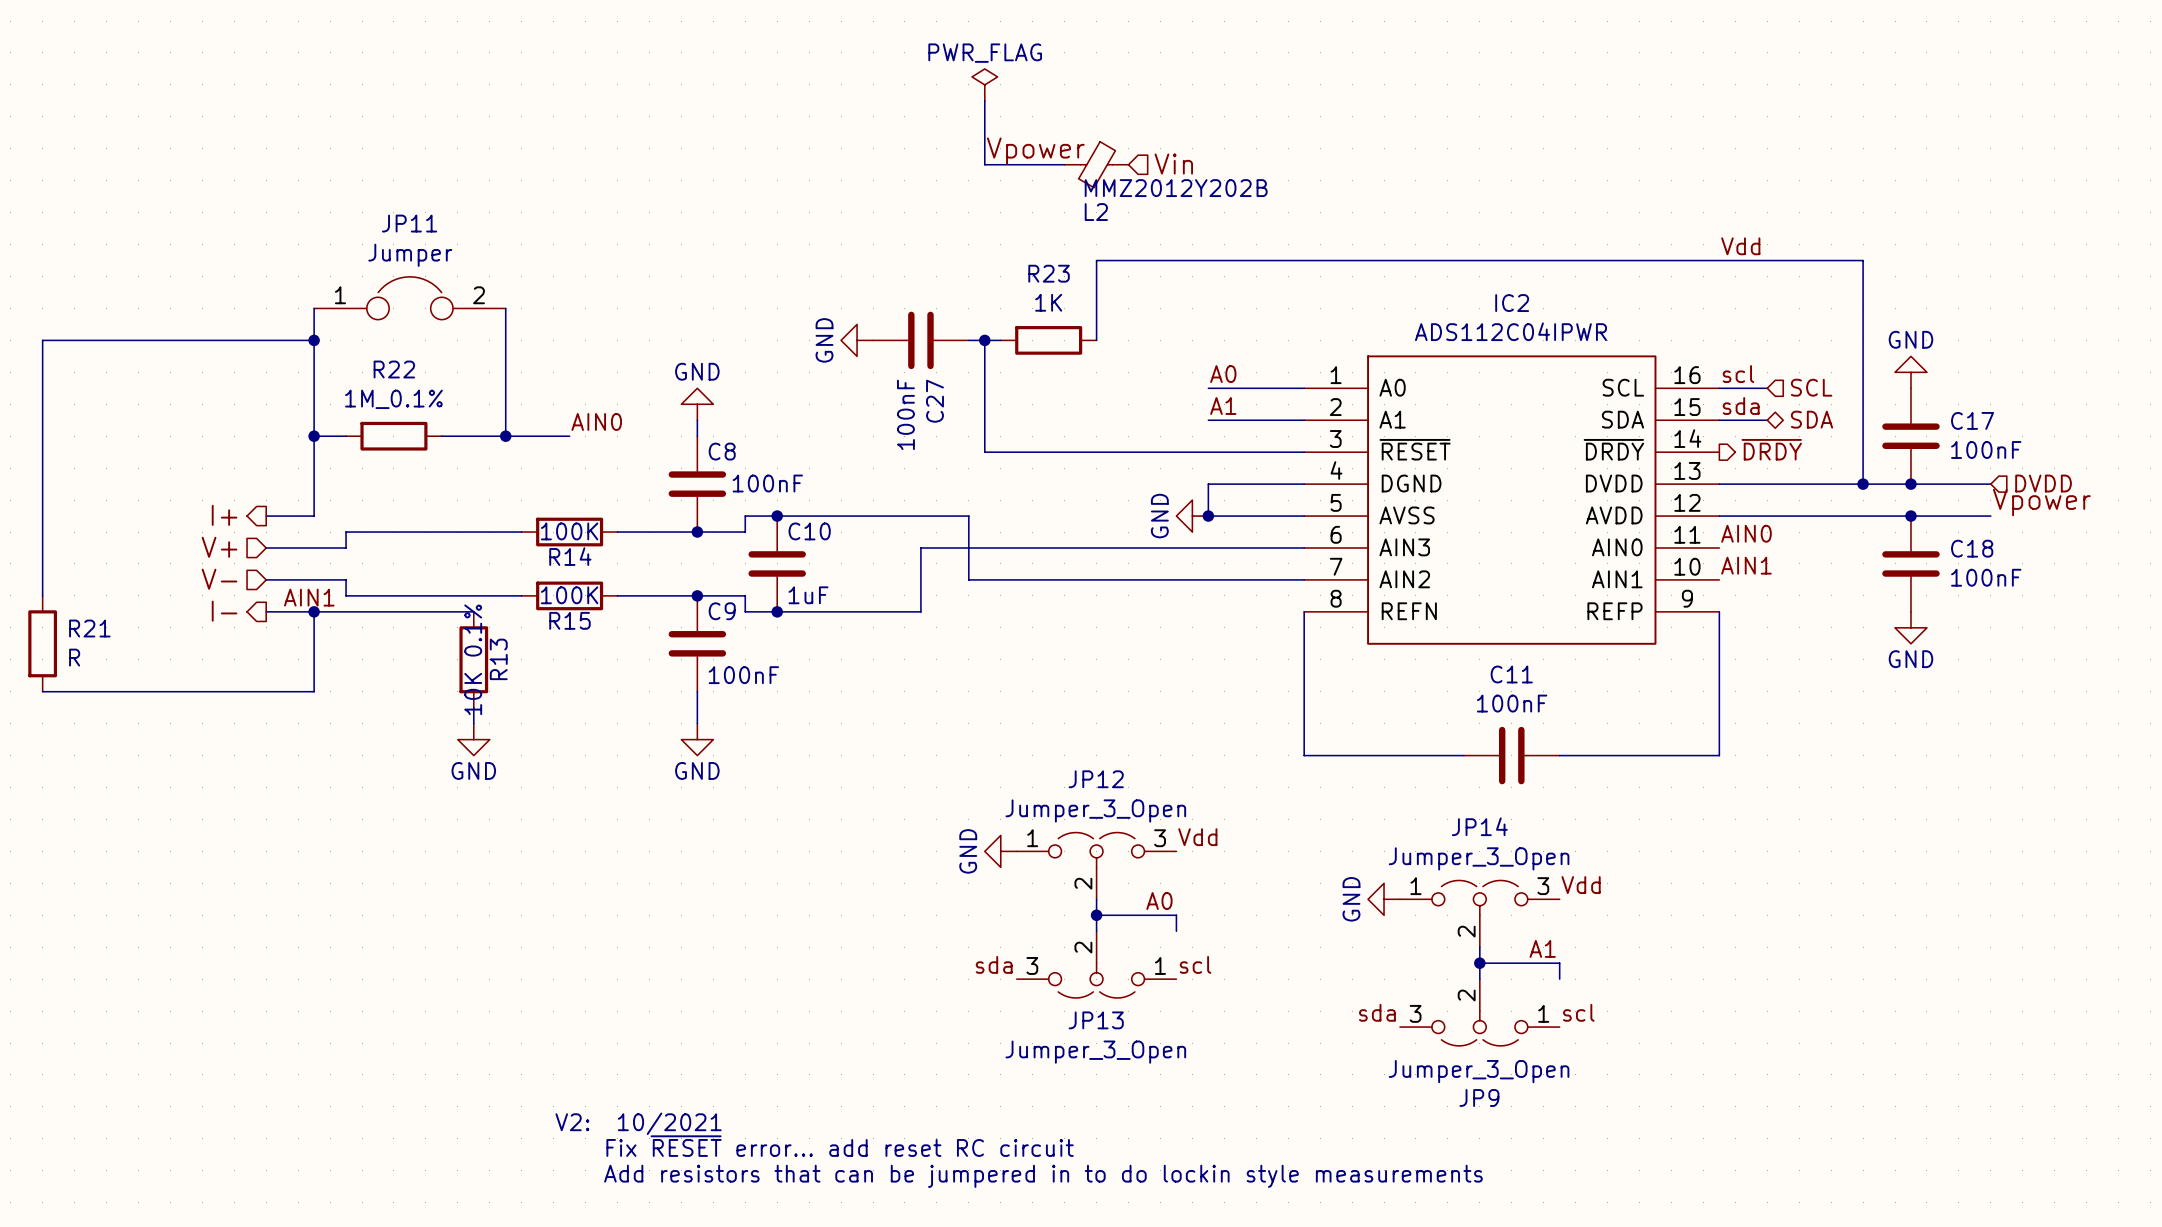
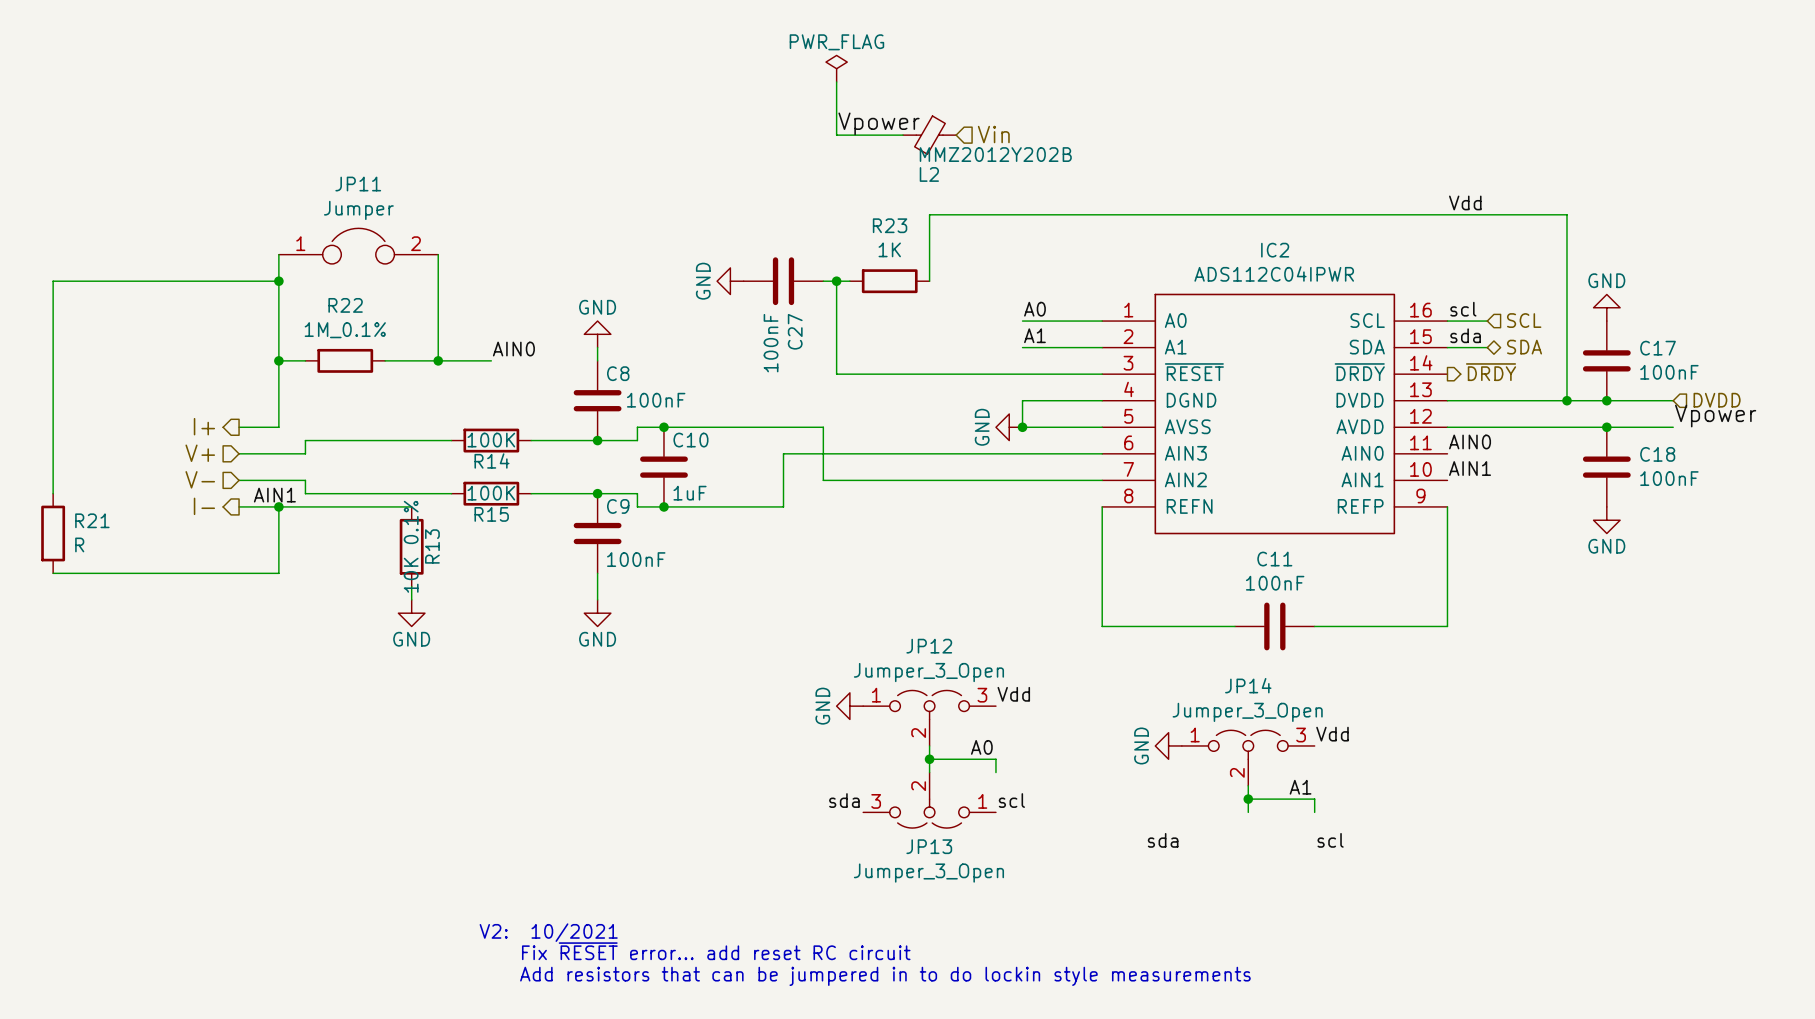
JP9: Jumper_3_Open (1479, 1012) -> none

